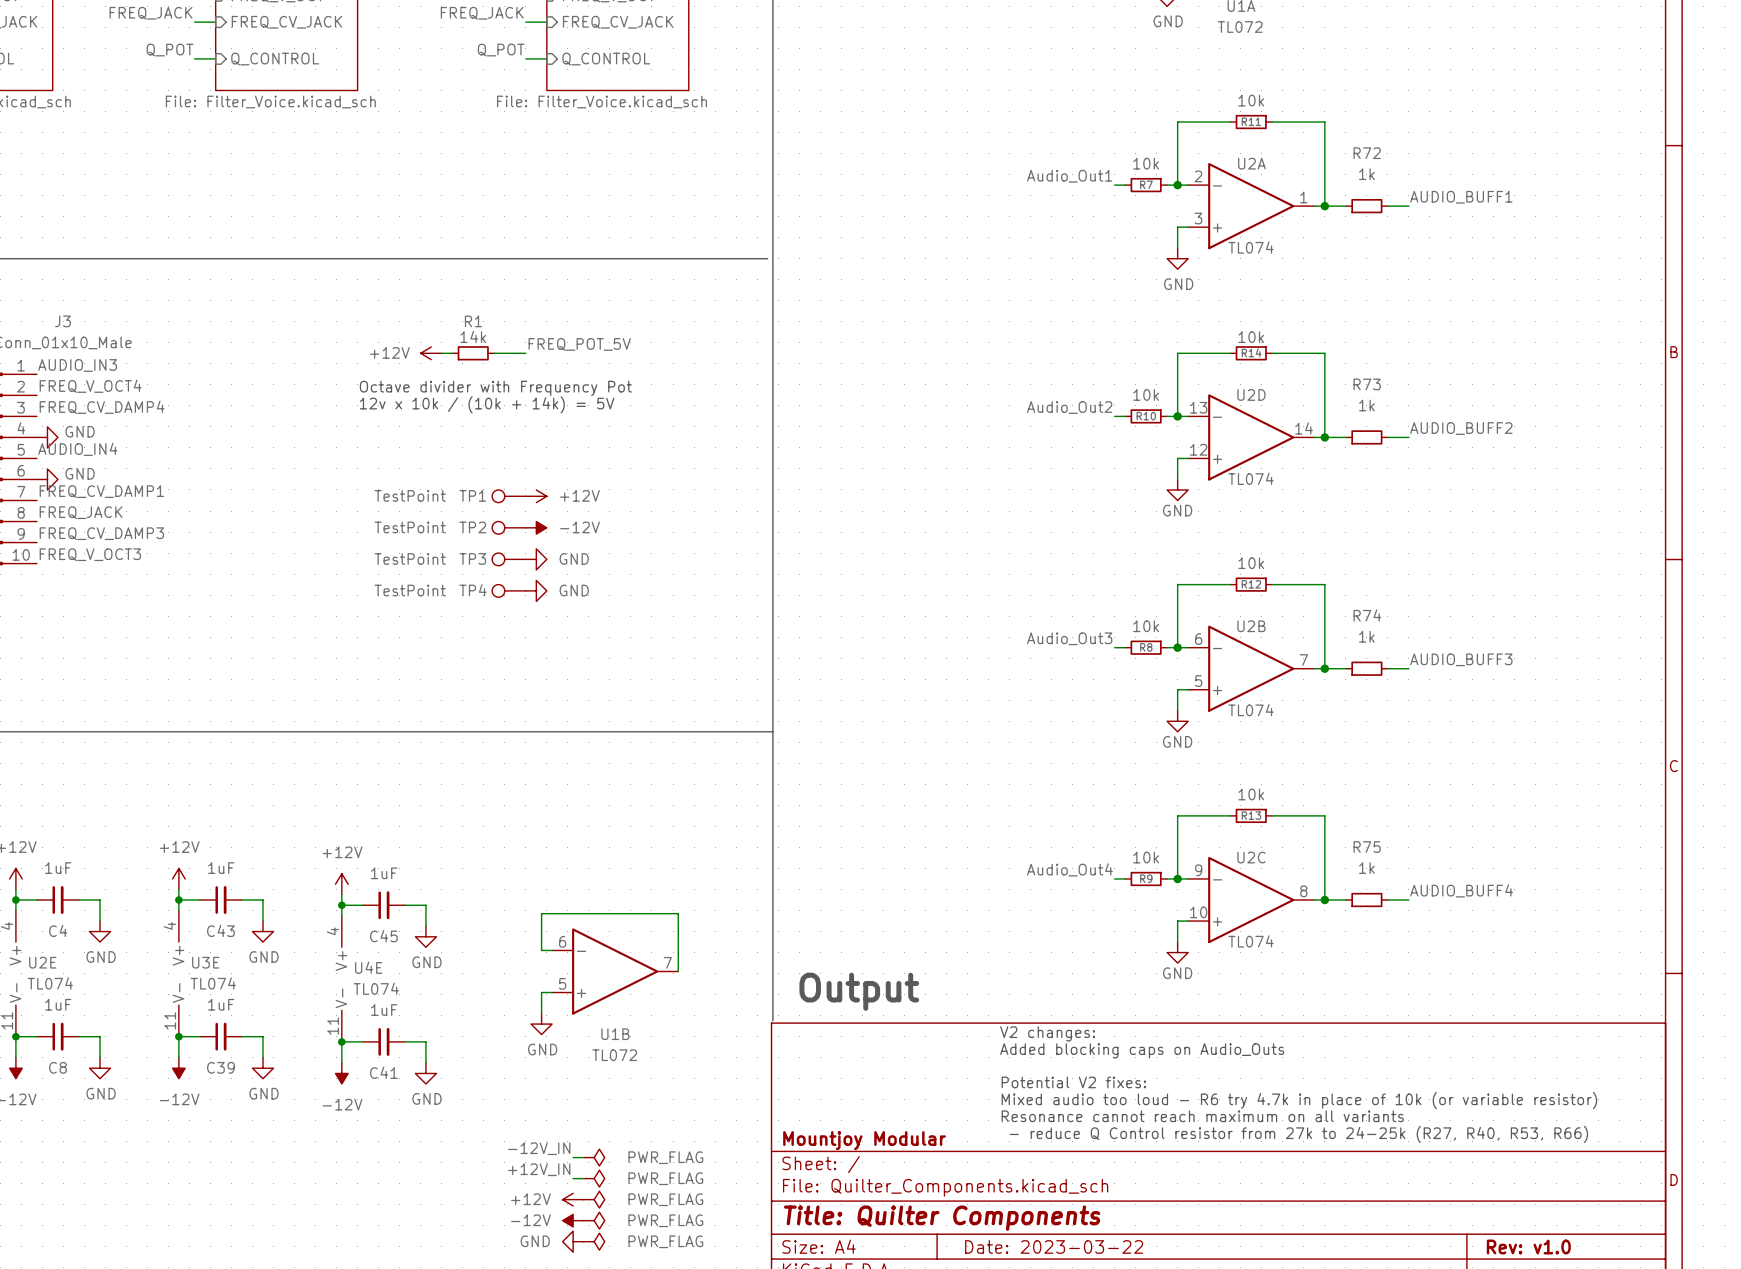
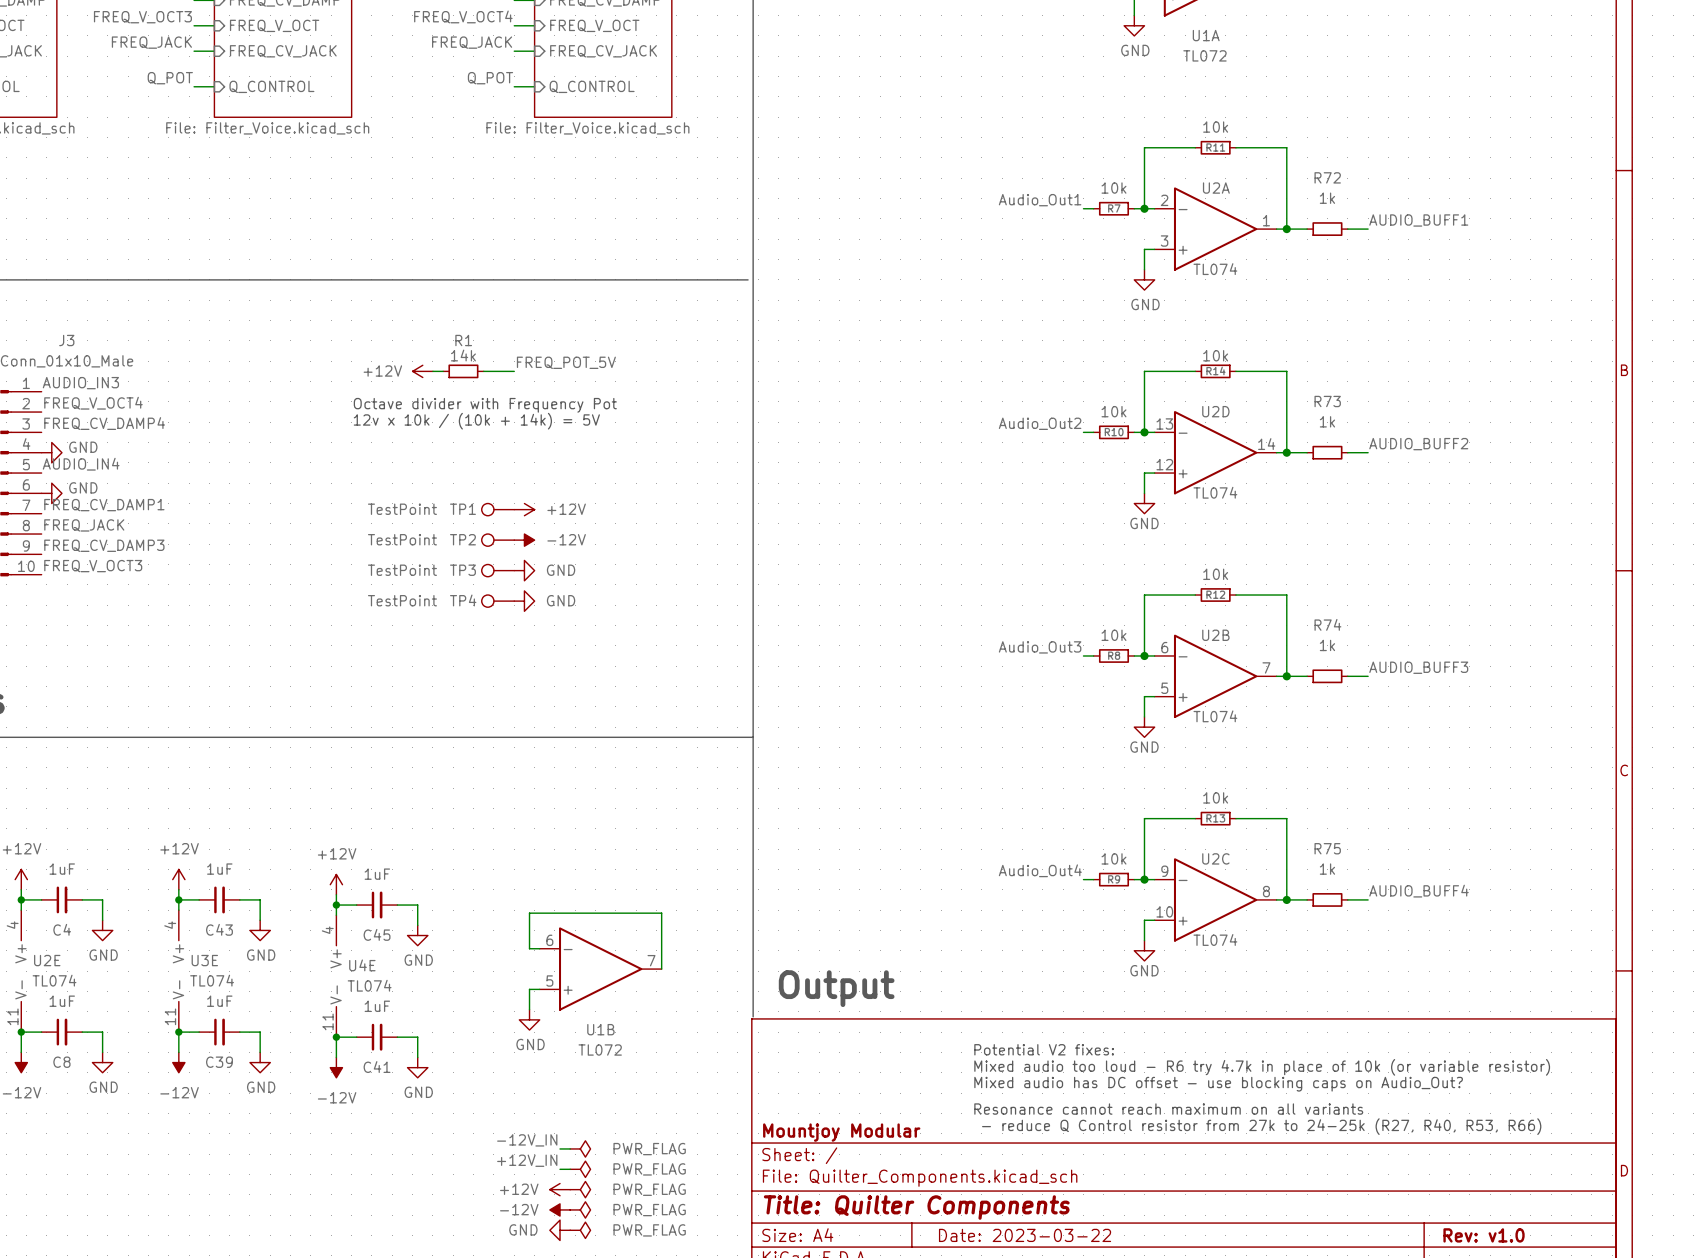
text: V2 changes: (1047, 1033) -> none
text: Added blocking caps on Audio_Outs (1142, 1050) -> none
text position: Potential V2 fixes: (1073, 1082) -> Potential V2 fixes: (1044, 1049)
text: none -> Mixed audio has DC offset - use blocking caps on Audio_Out? (1218, 1084)
text position: Mixed audio too loud - R6 try 4.7k in place of 10k (or variable resistor) (1299, 1100) -> Mixed audio too loud - R6 try 4.7k in place of 10k (or variable resistor) (1262, 1067)

